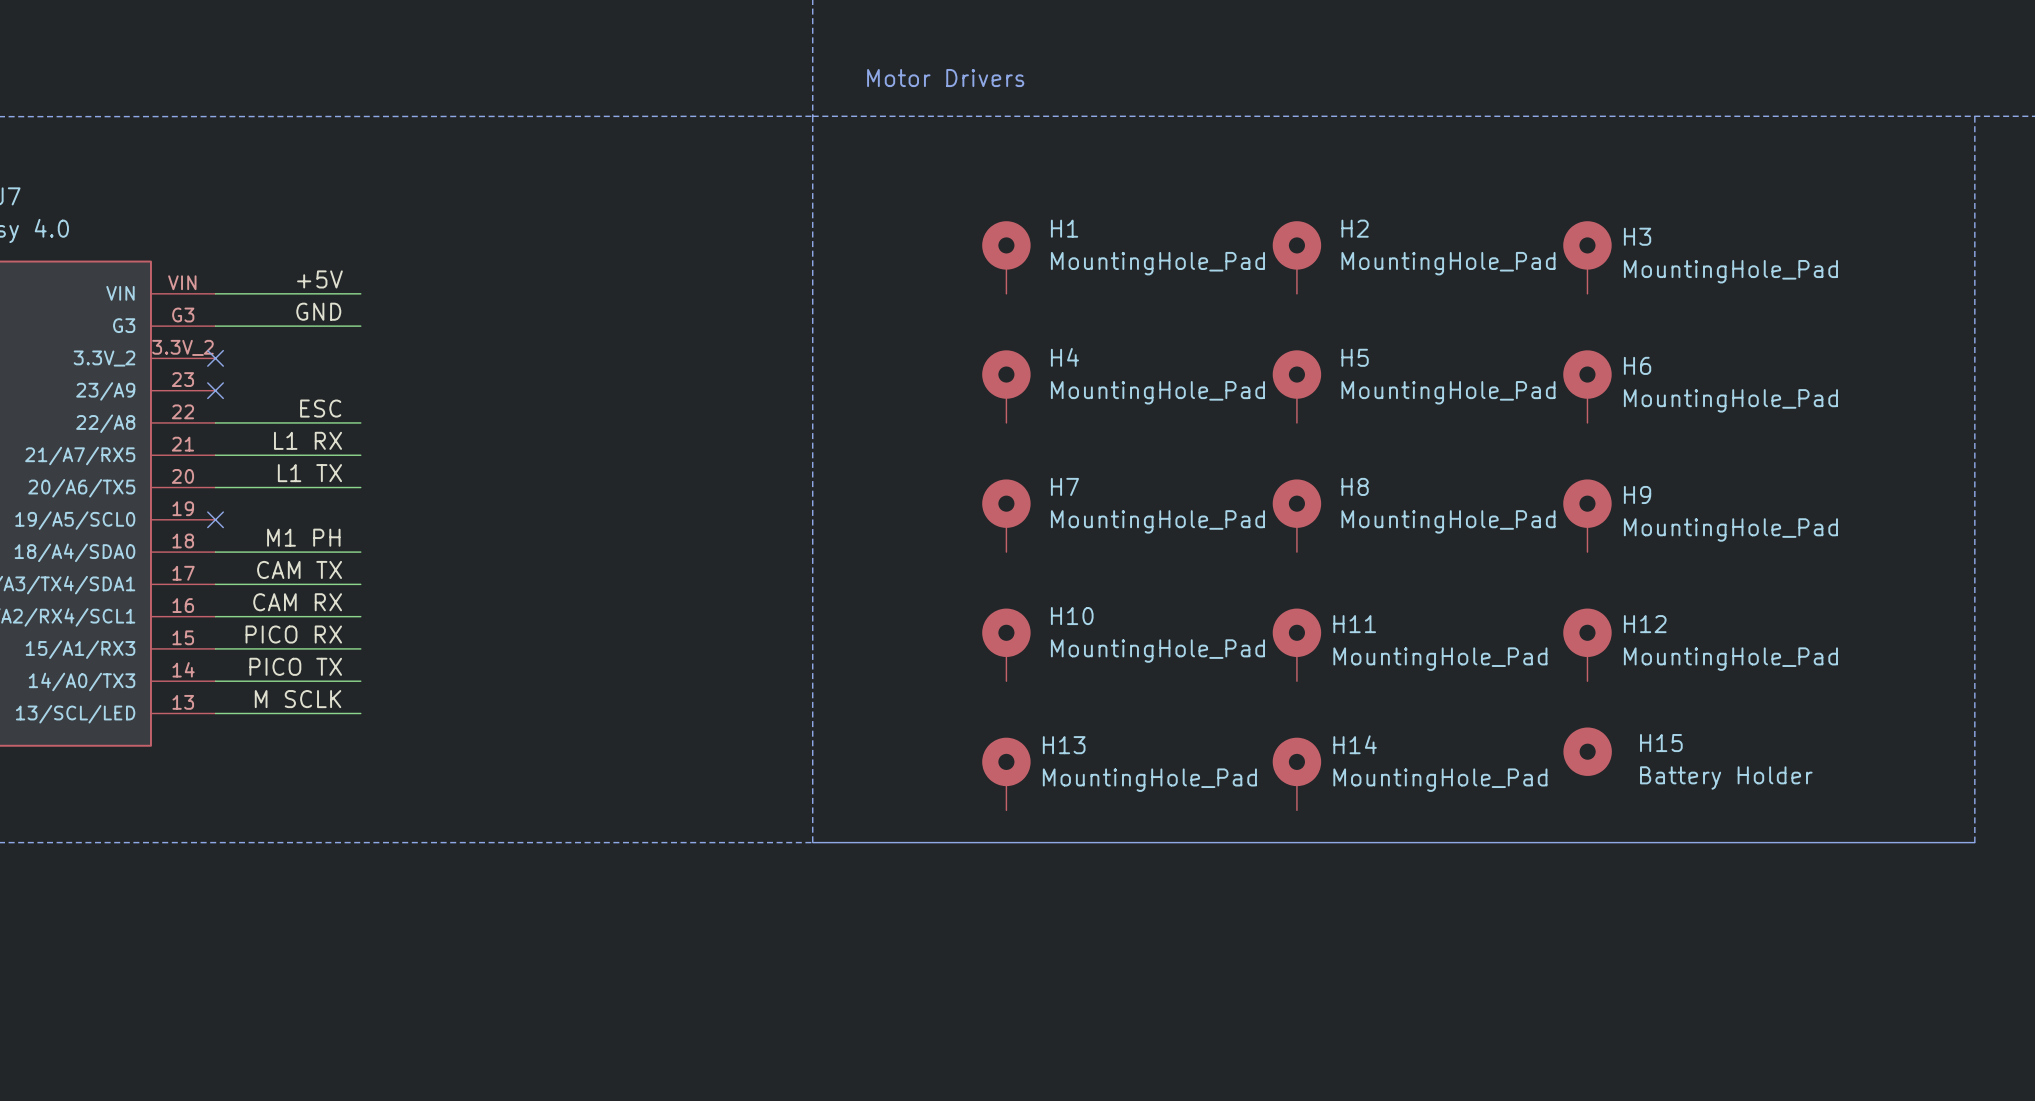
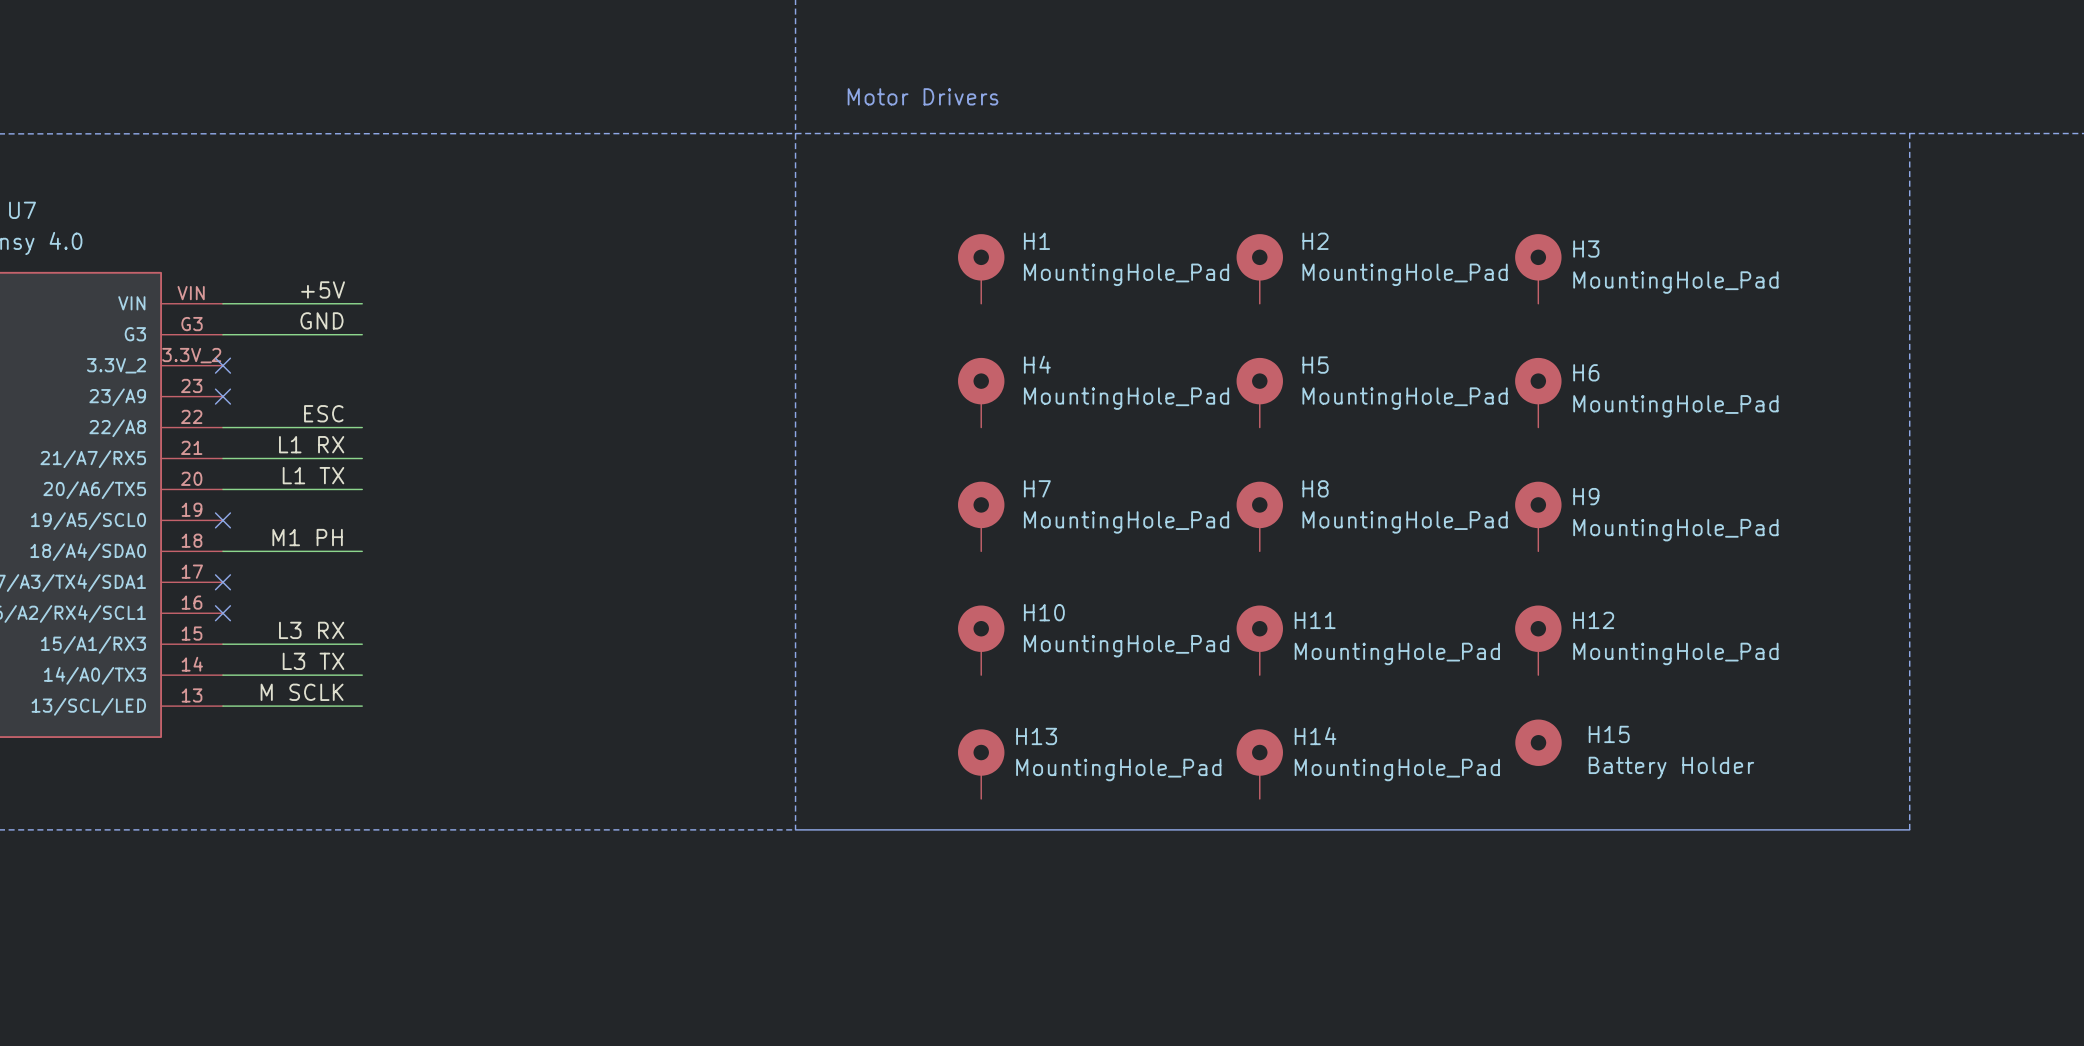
label: CAM TX (299, 569) -> none
wire: (215, 584) (360, 584) -> none
no-connect mark: none -> (222, 582)
label: CAM RX (297, 602) -> none
wire: (215, 616) (360, 616) -> none
no-connect mark: none -> (222, 613)
label: PICO RX (293, 634) -> L3 RX (311, 630)
label: PICO TX (295, 666) -> L3 TX (313, 661)

